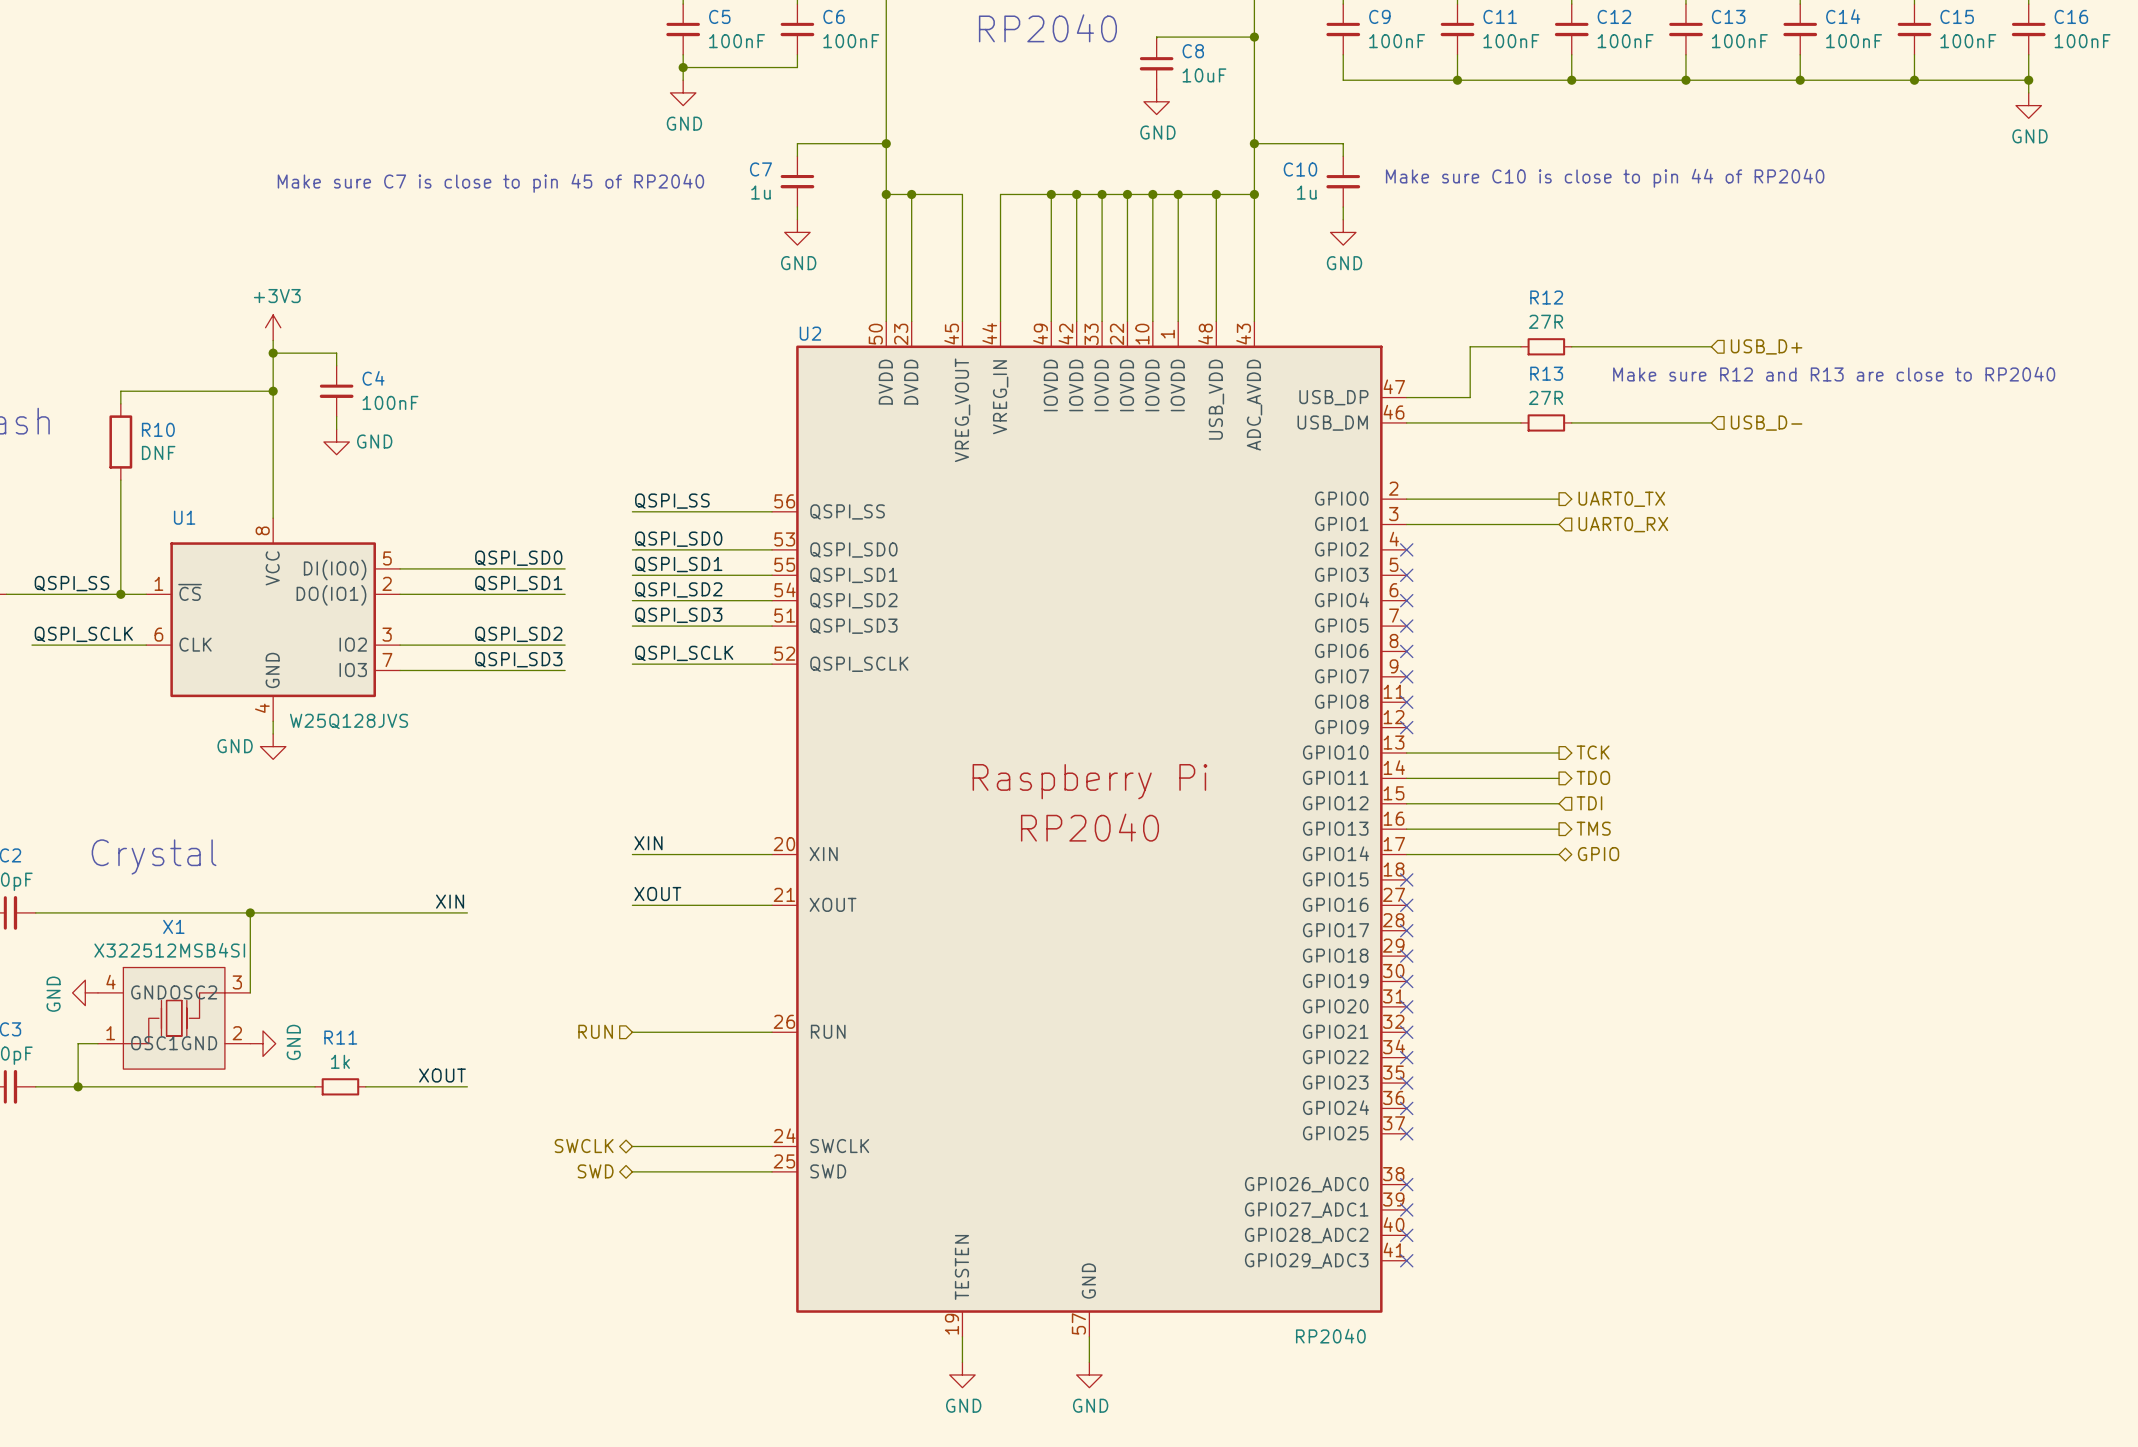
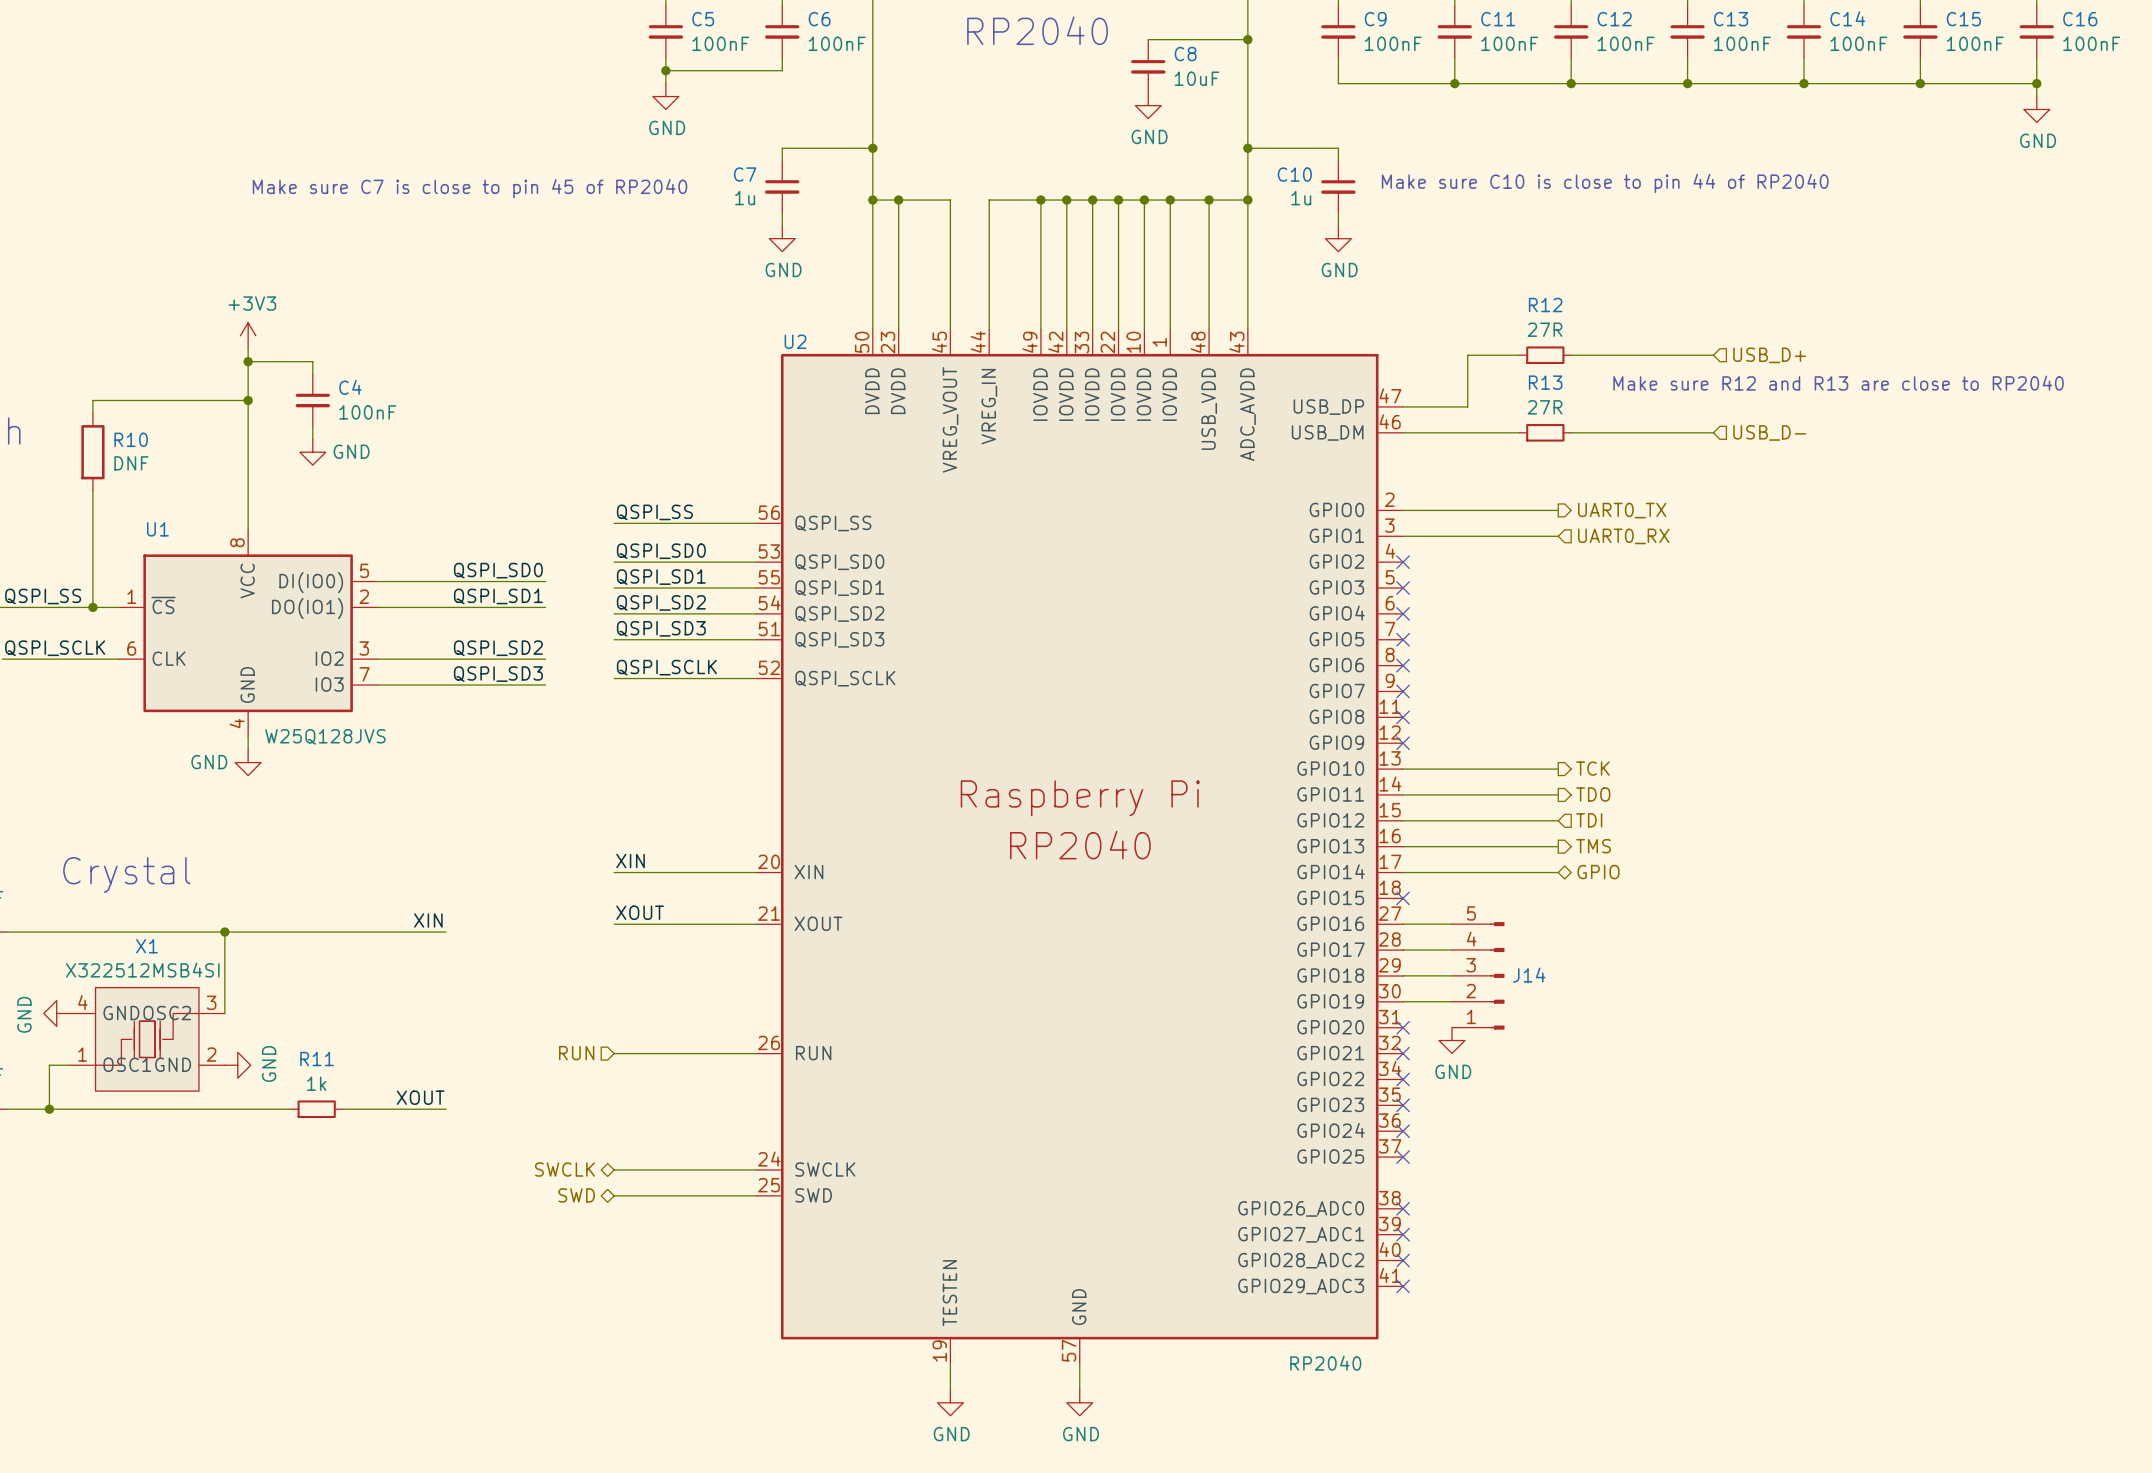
wire: none -> (1403, 924) (1452, 924)
no-connect mark: (1406, 905) -> none
wire: none -> (1403, 950) (1452, 950)
no-connect mark: (1406, 930) -> none
wire: none -> (1403, 975) (1452, 975)
J14: none -> (1478, 975)
no-connect mark: (1406, 956) -> none
wire: none -> (1403, 1001) (1452, 1001)
no-connect mark: (1406, 981) -> none
power symbol: none -> GND (1452, 1040)

